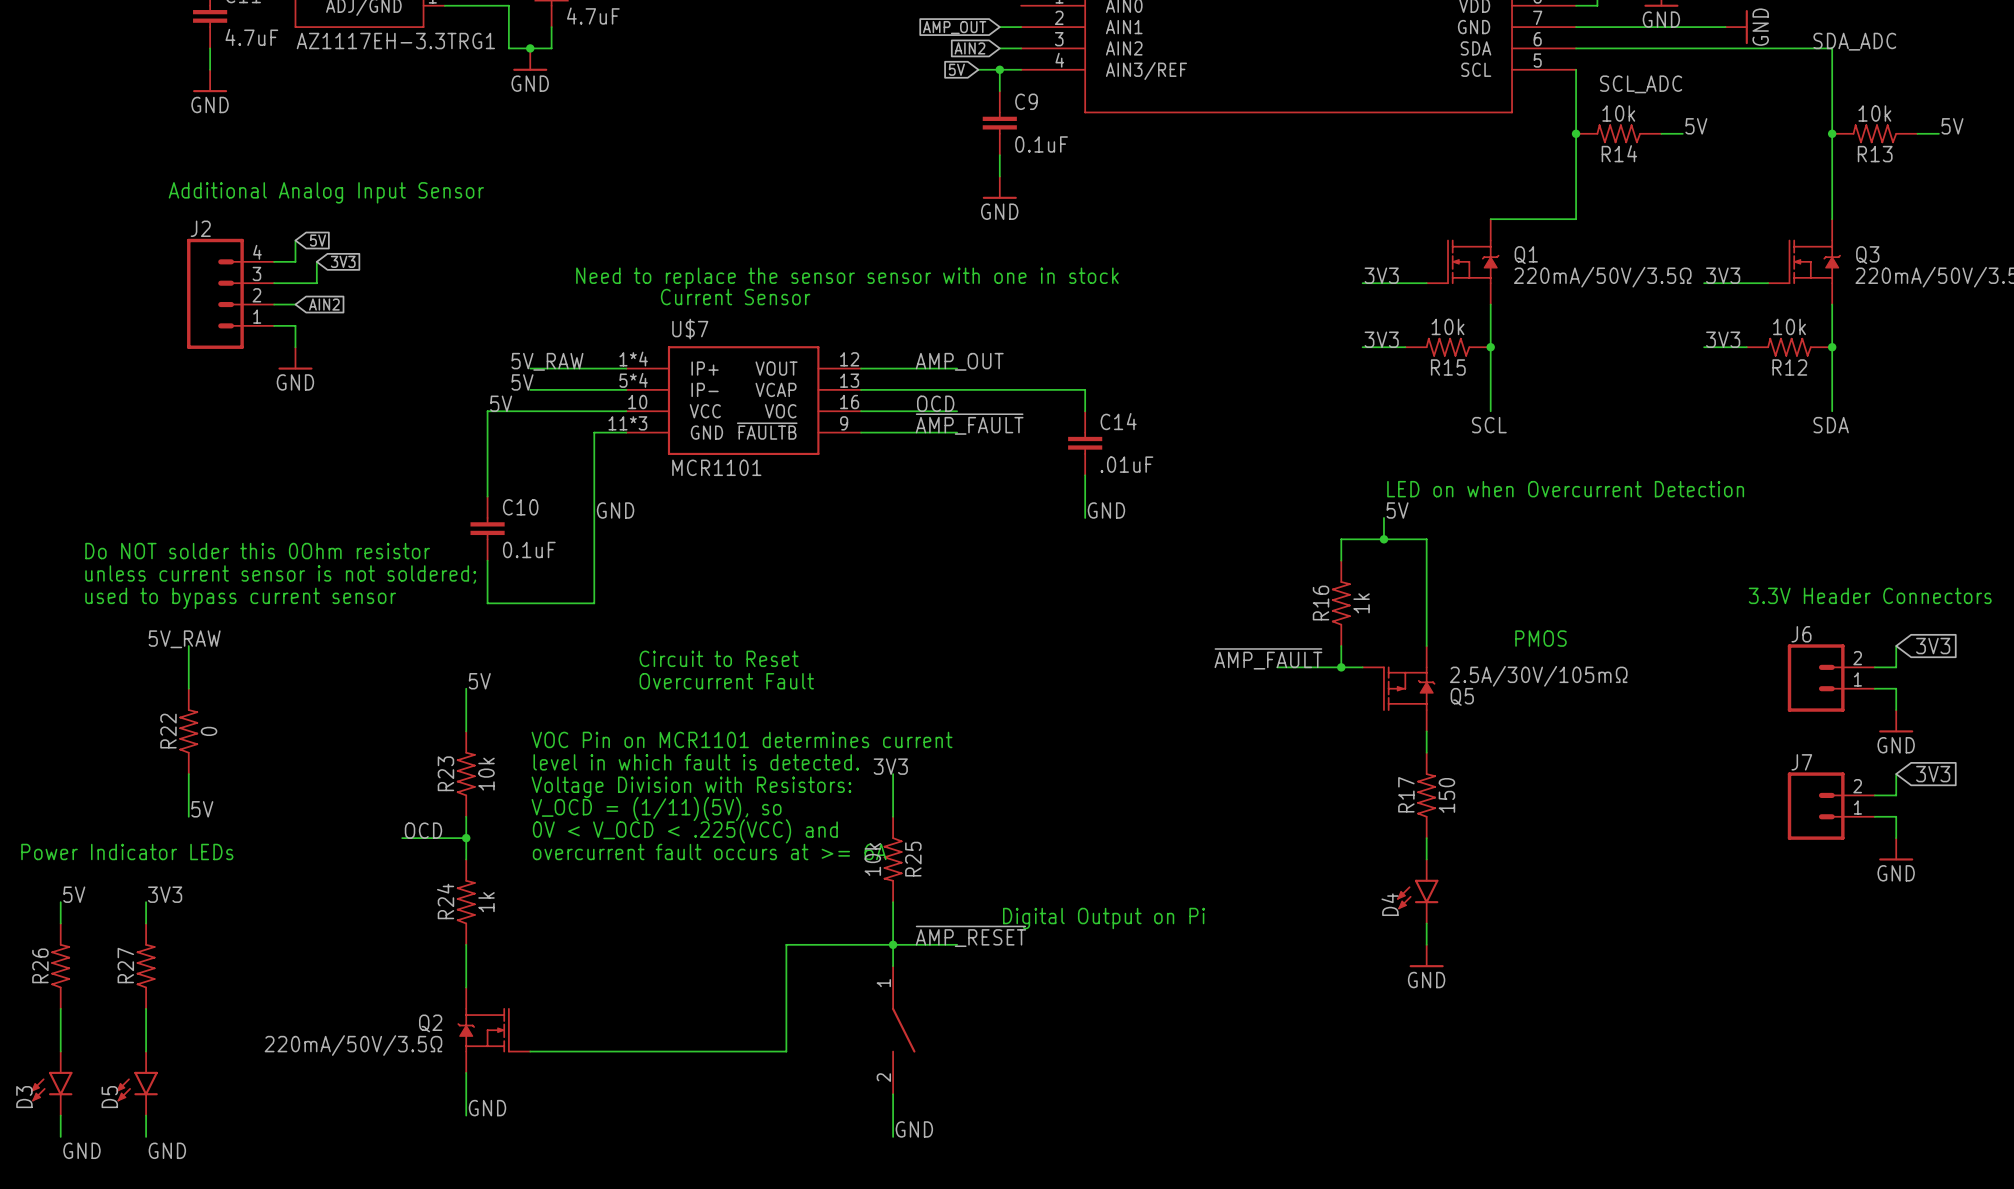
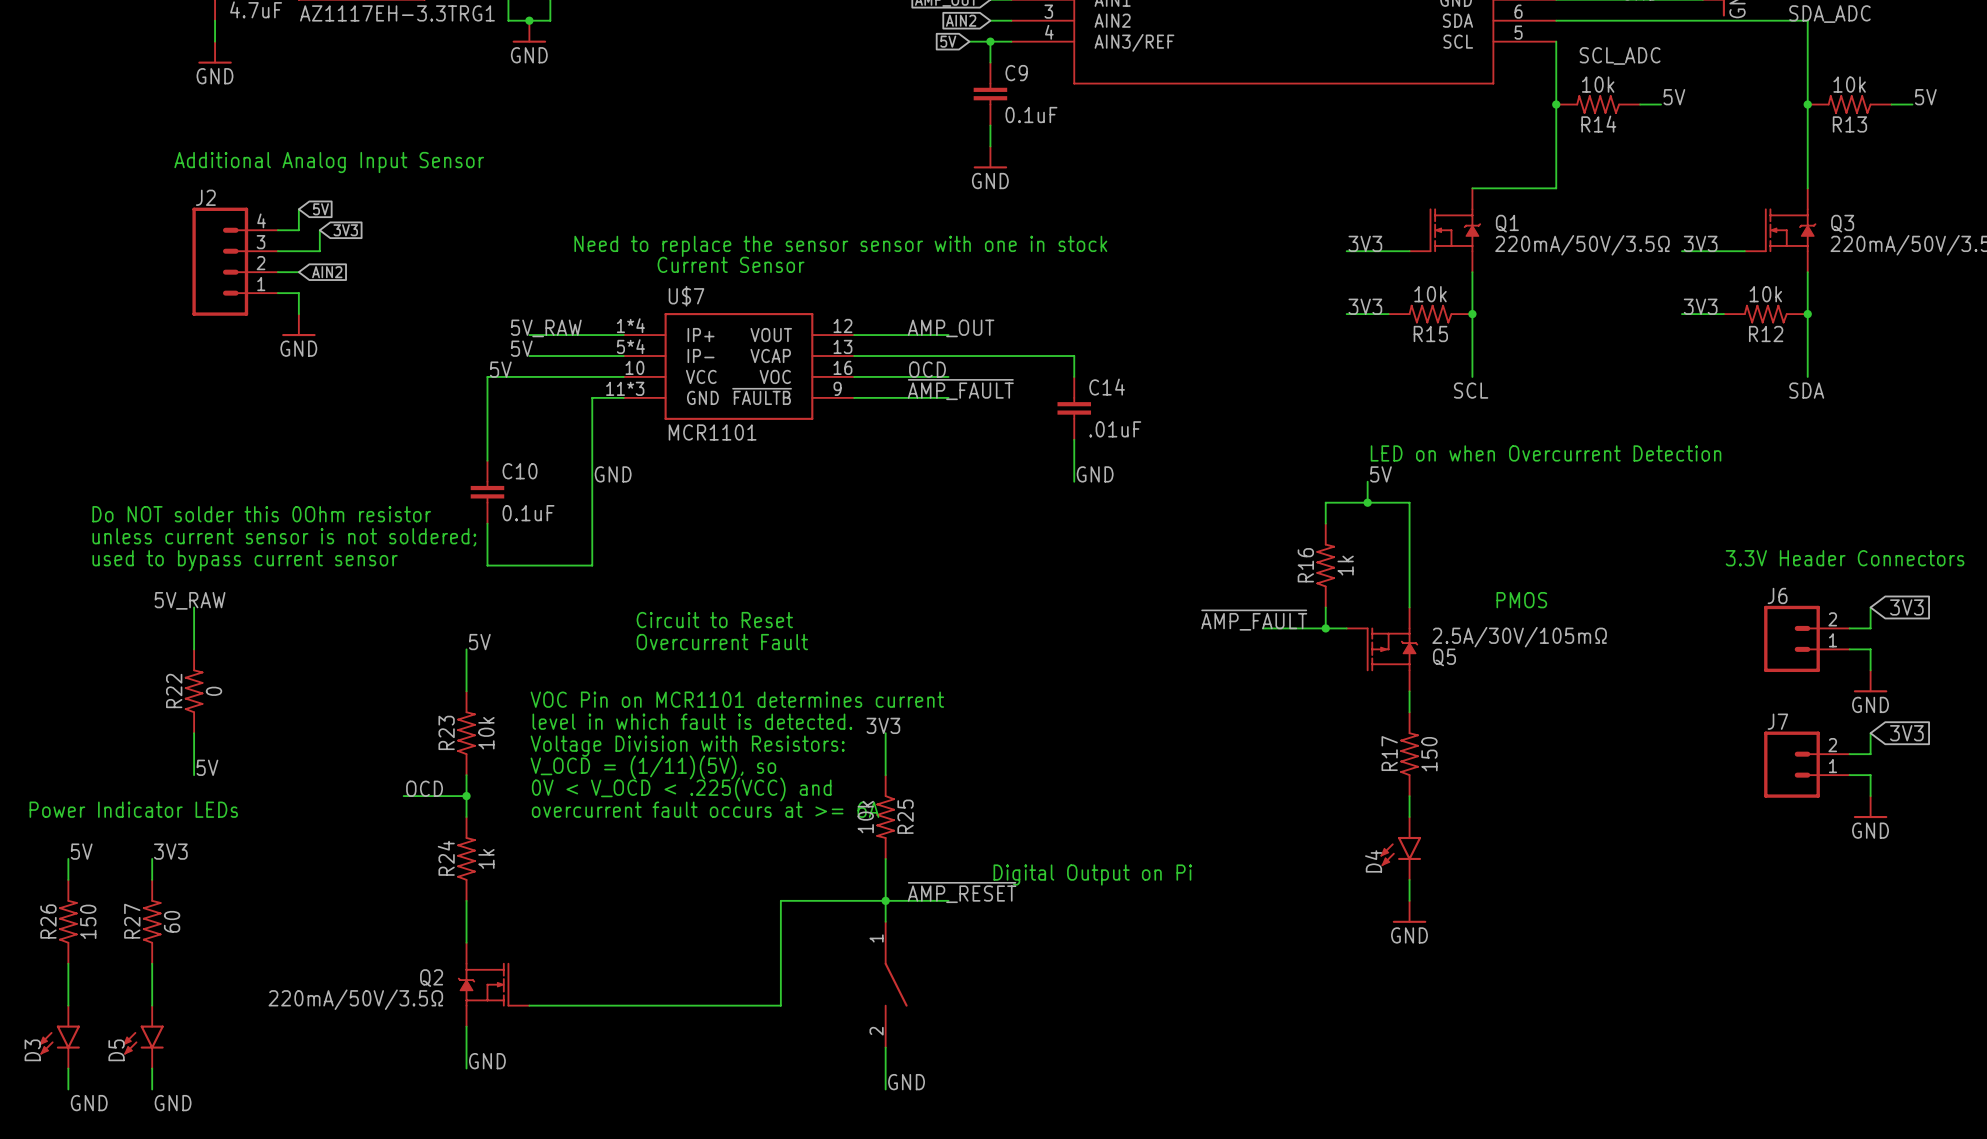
R26 value: none -> 150 (88, 921)
R27 value: none -> 60 (172, 921)

